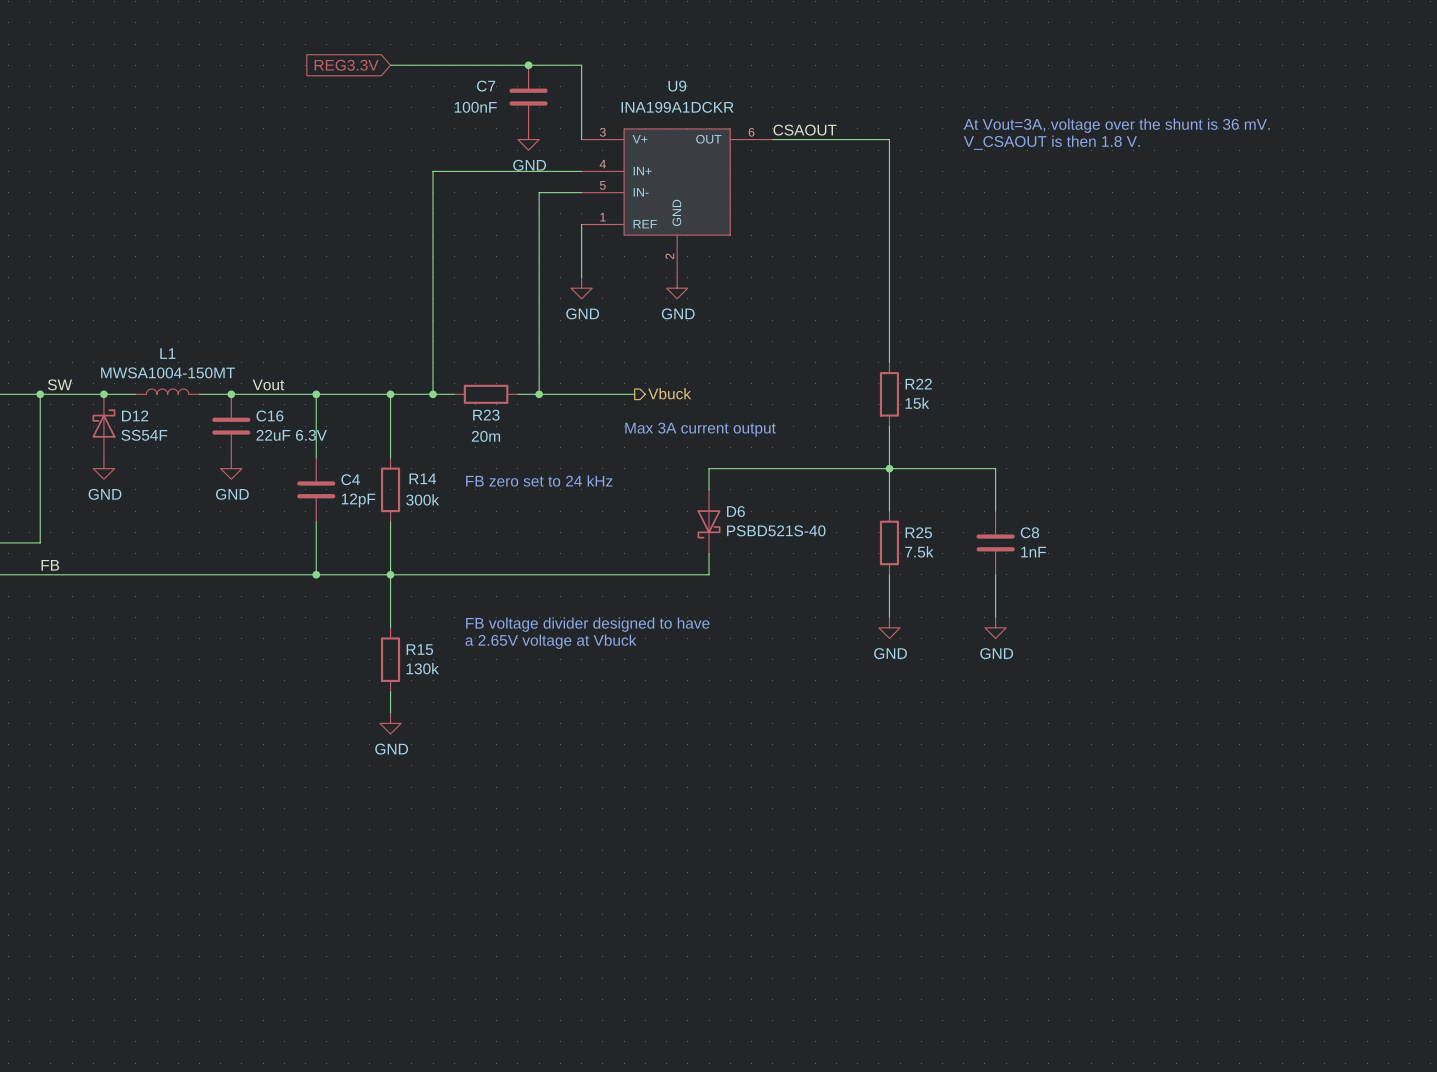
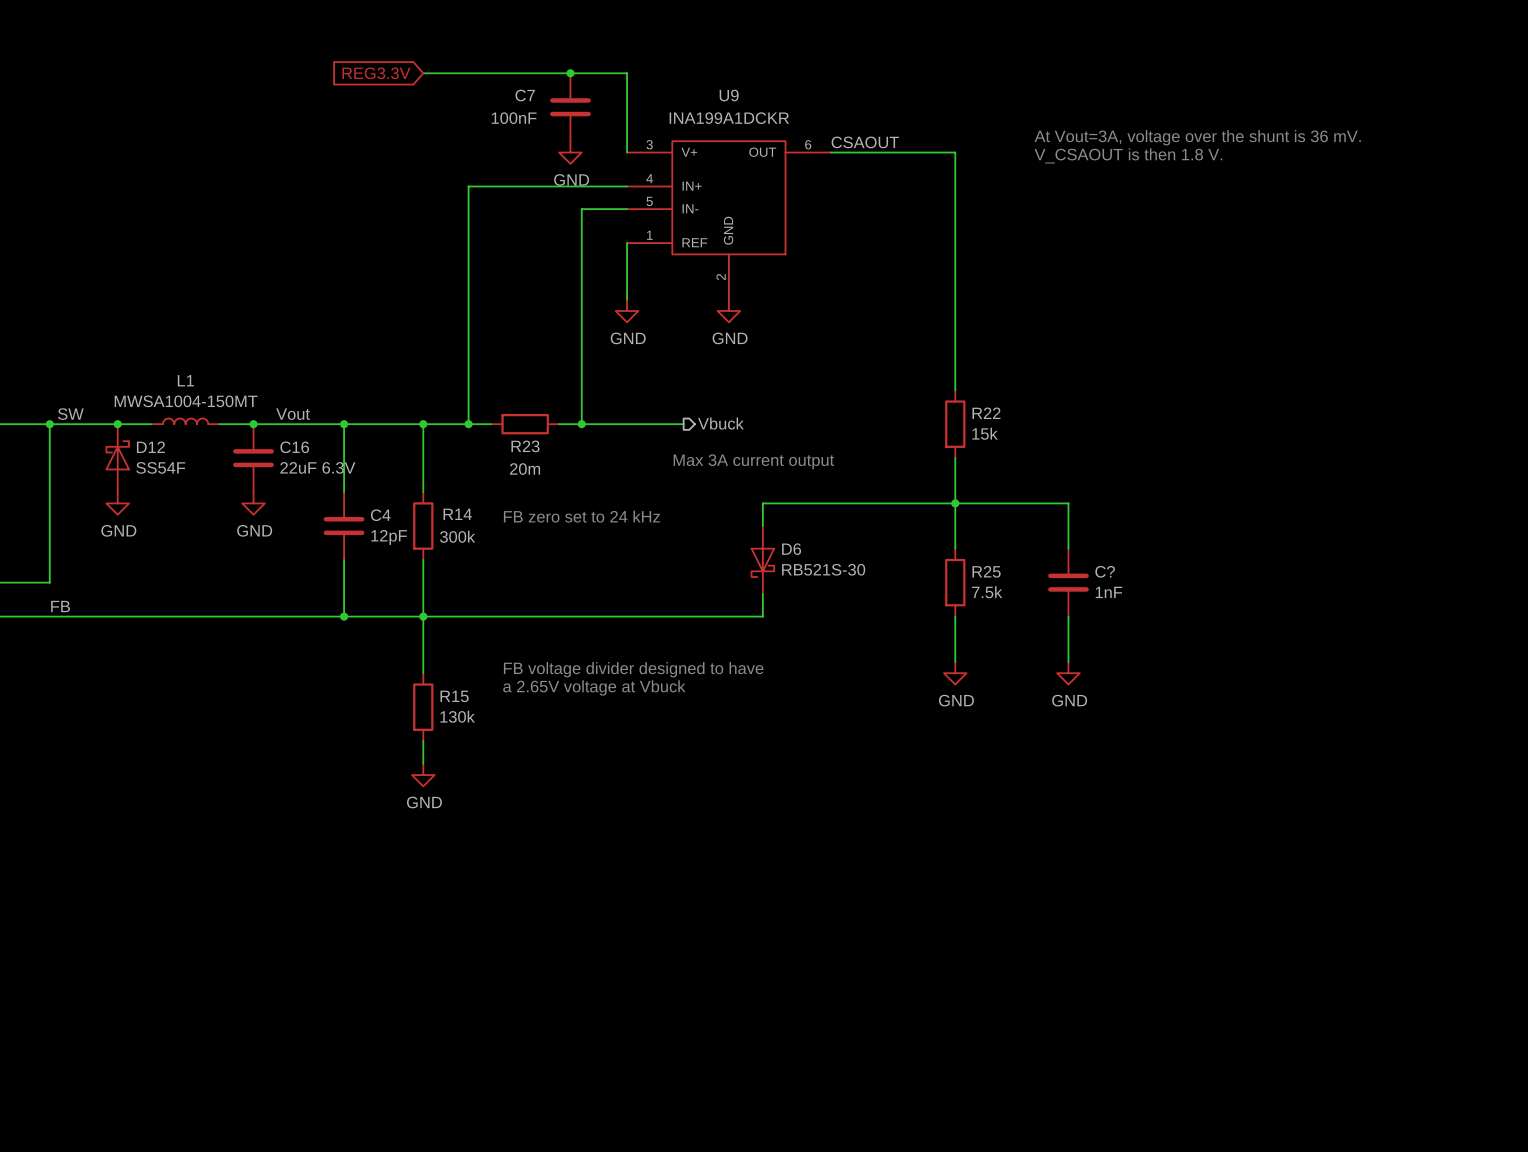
D6 value: PSBD521S-40 (776, 530) -> RB521S-30 (823, 569)
C8 name: C8 (1029, 532) -> C? (1105, 571)

